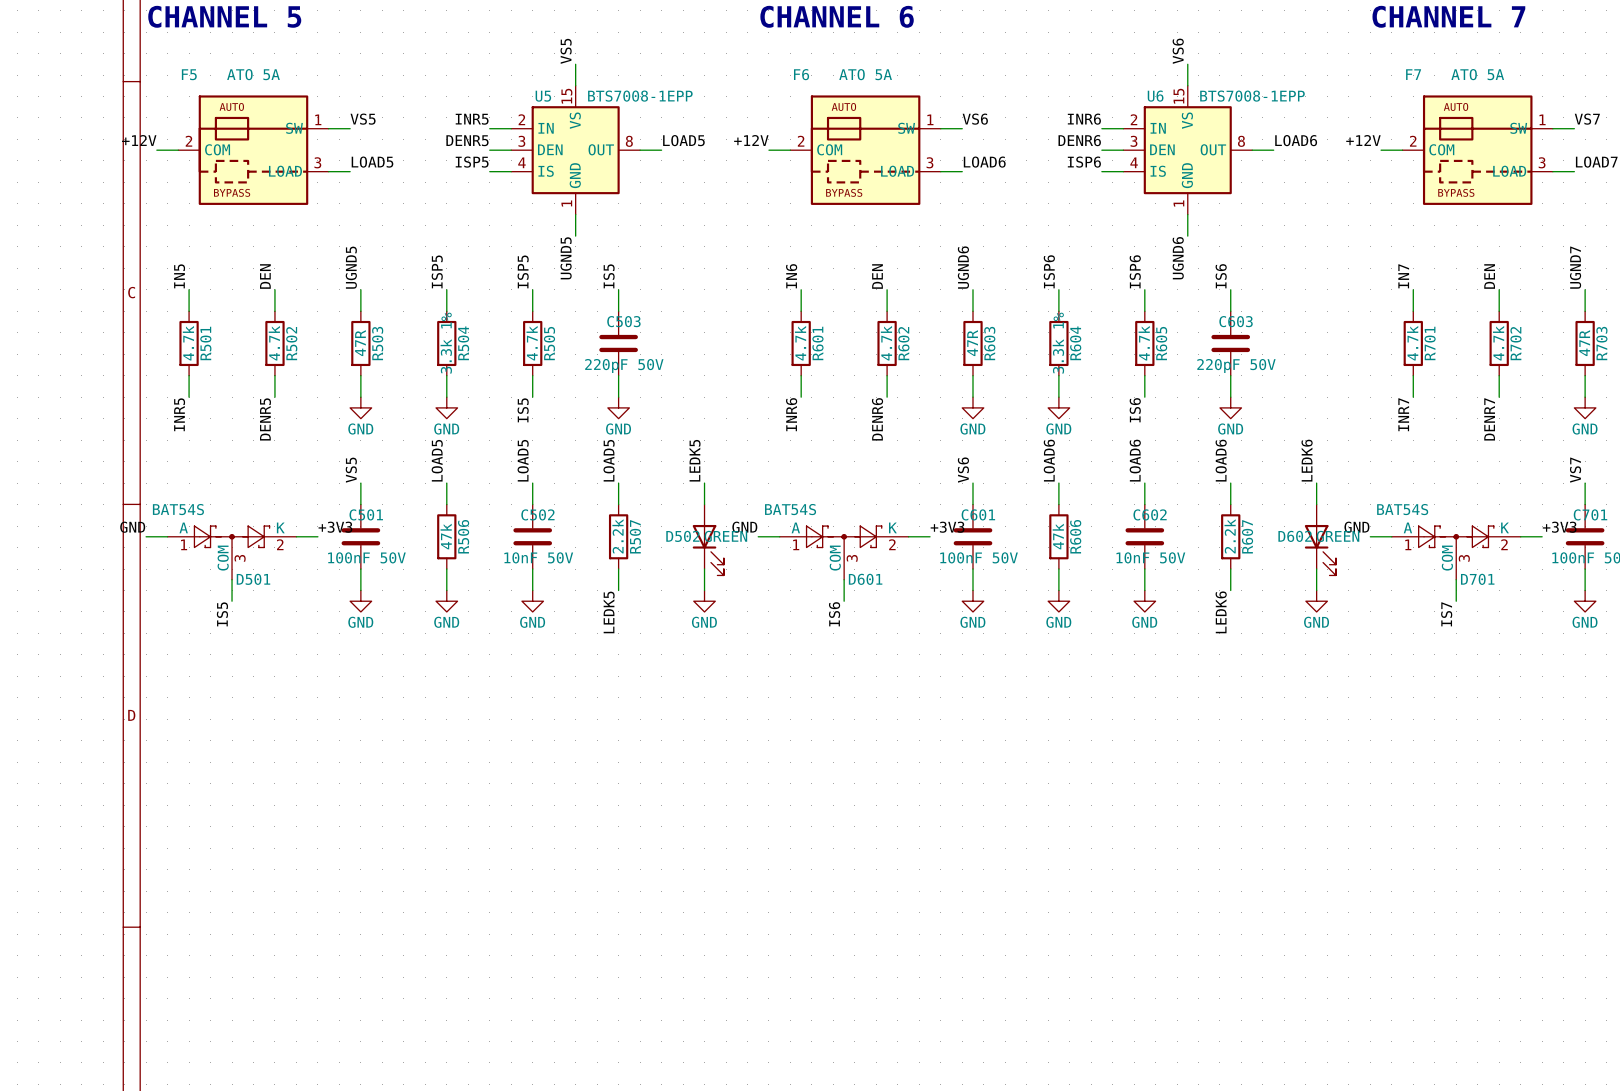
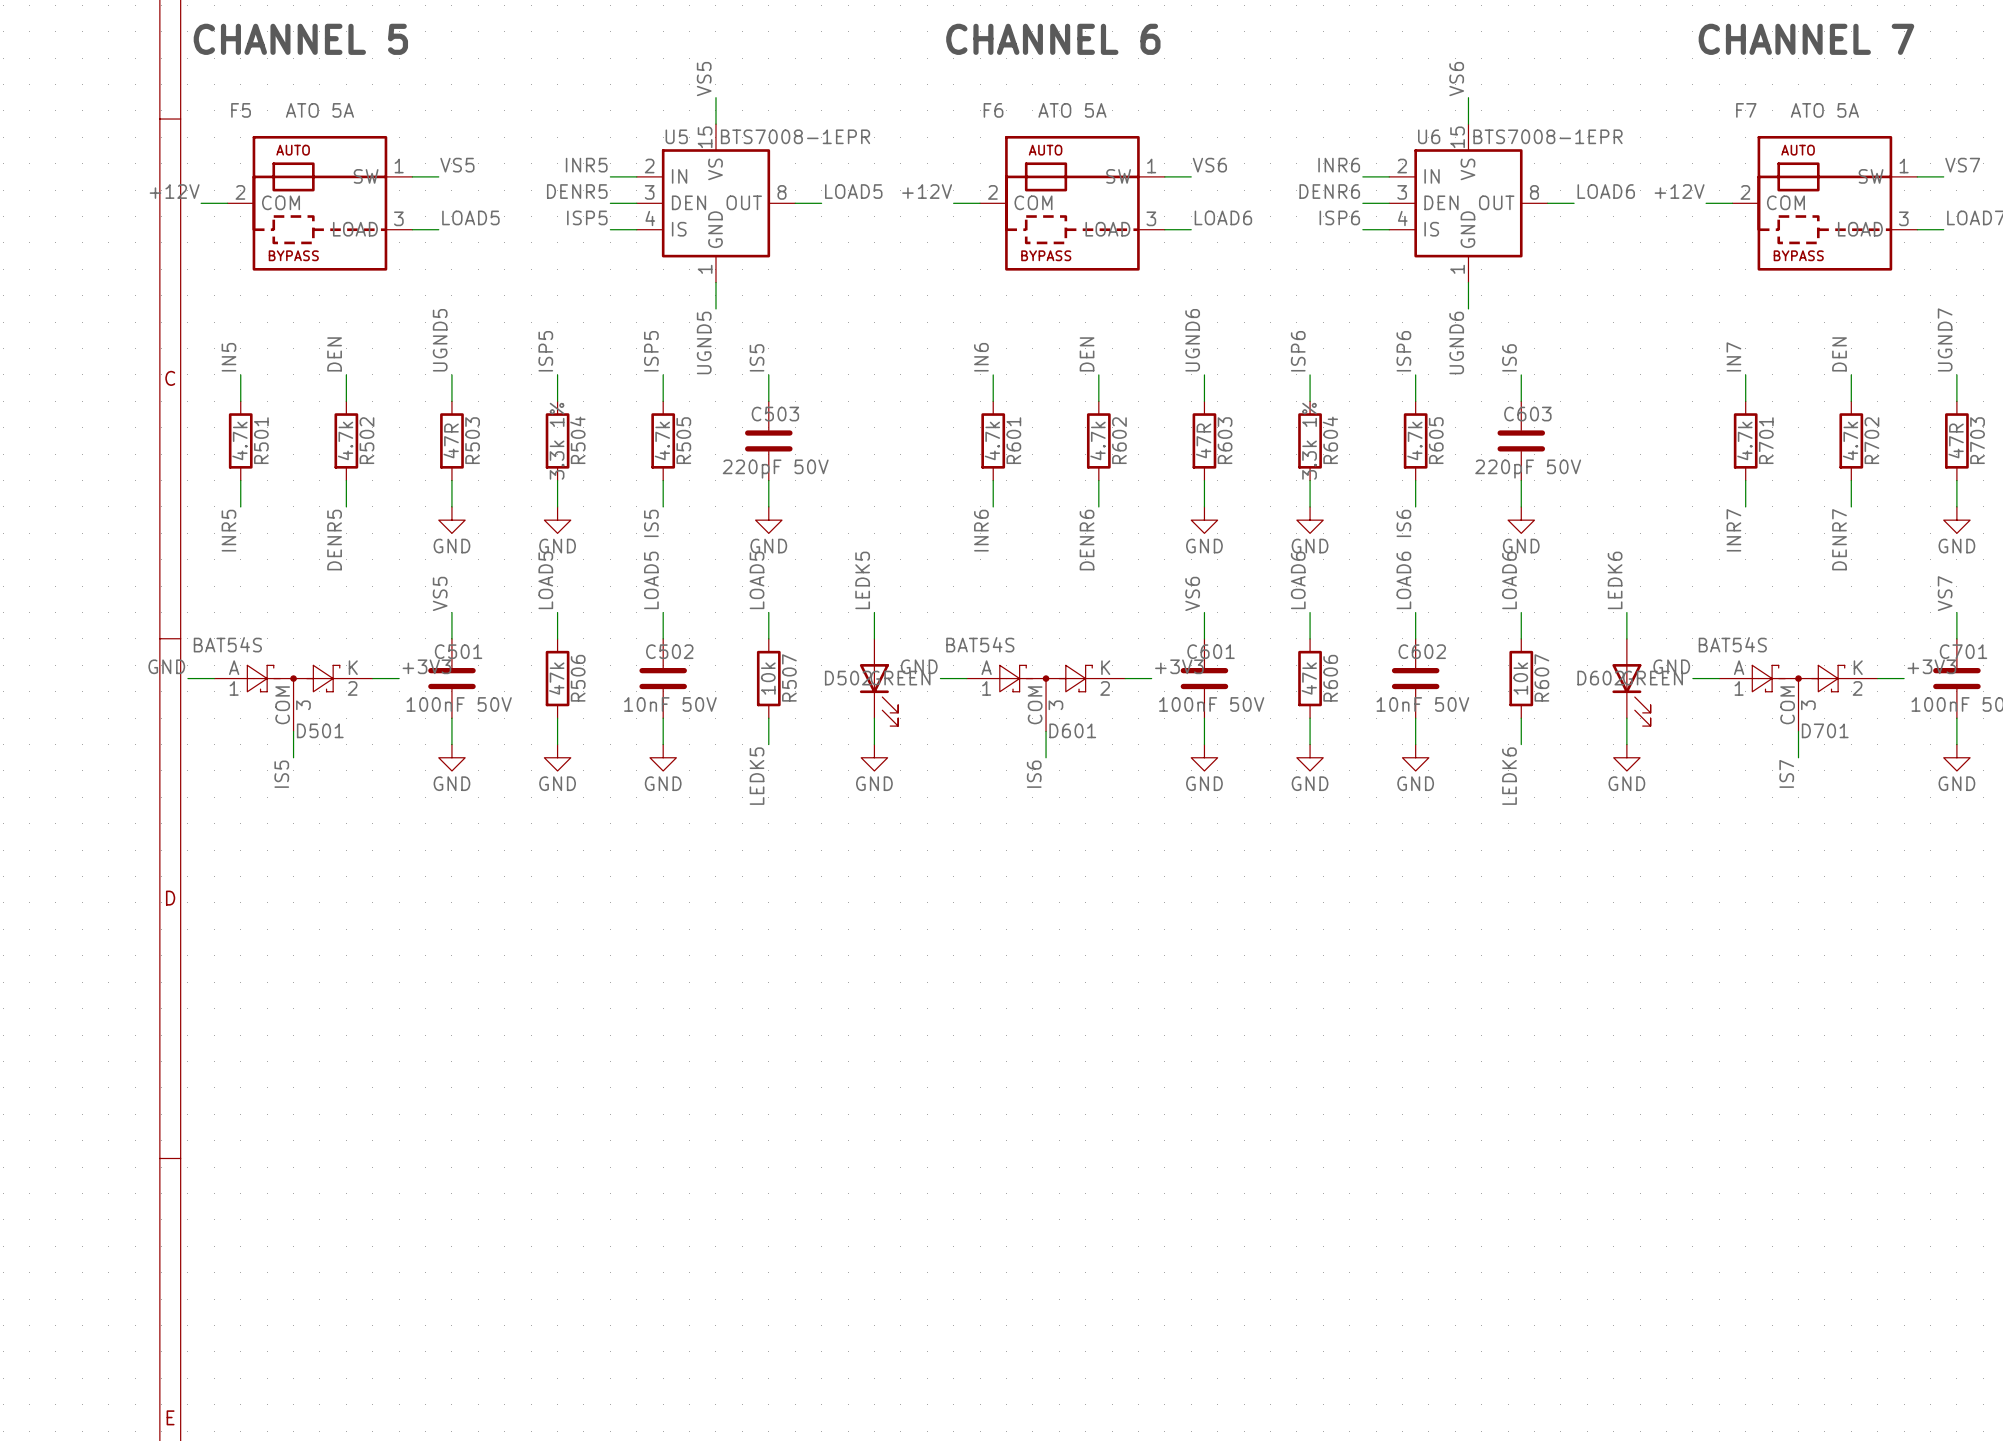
U5 value: BTS7008-1EPP (640, 96) -> BTS7008-1EPR (795, 136)
U6 value: BTS7008-1EPP (1252, 96) -> BTS7008-1EPR (1547, 136)
R507 value: 2.2k (617, 536) -> 10k (768, 678)
R607 value: 2.2k (1230, 536) -> 10k (1520, 678)

